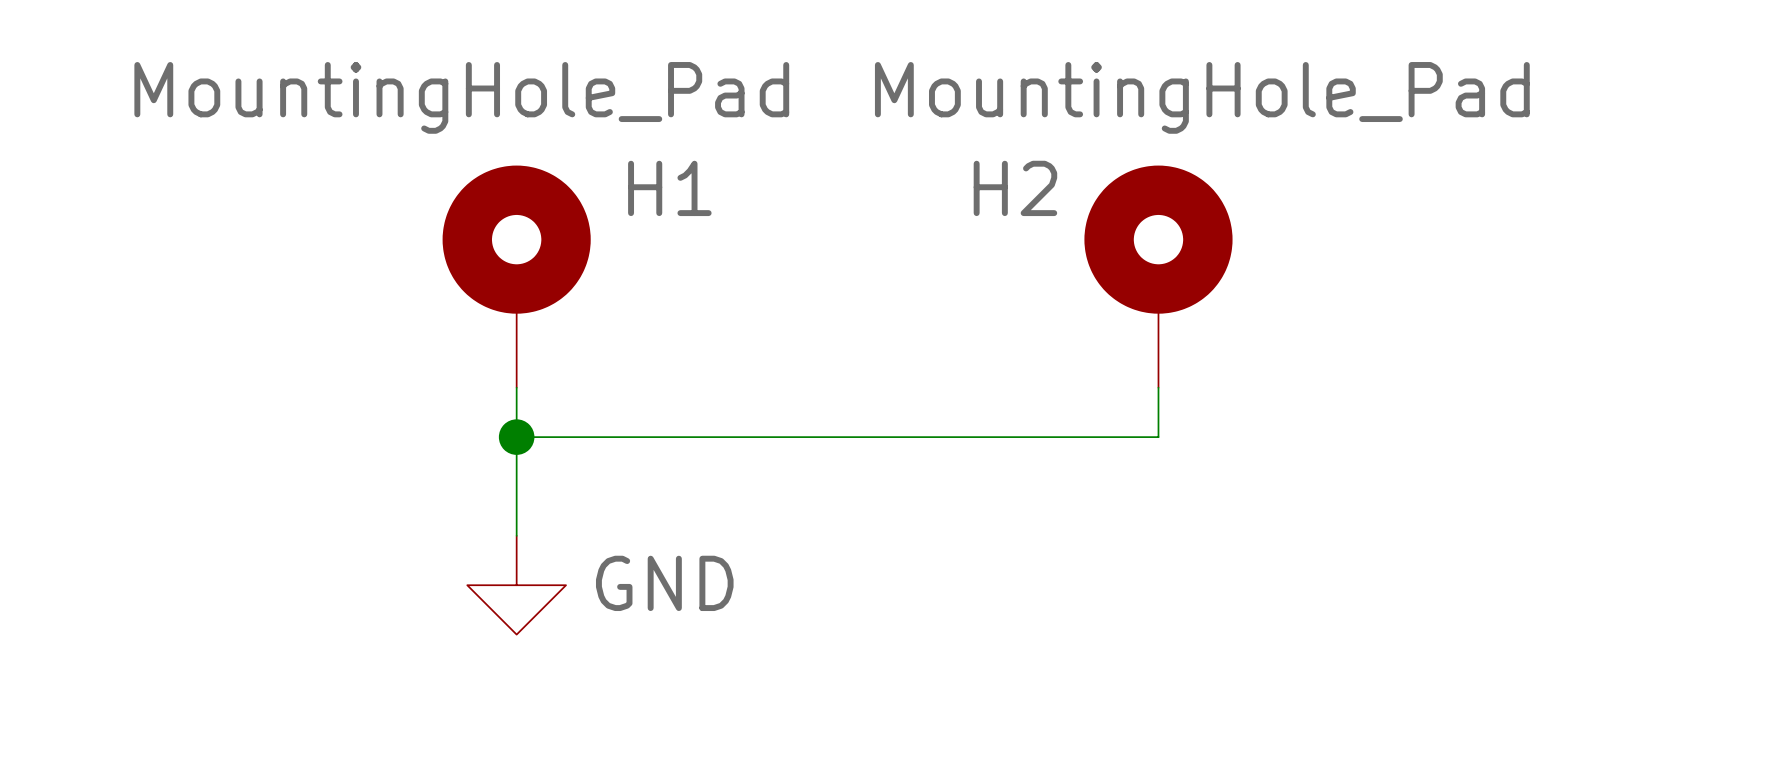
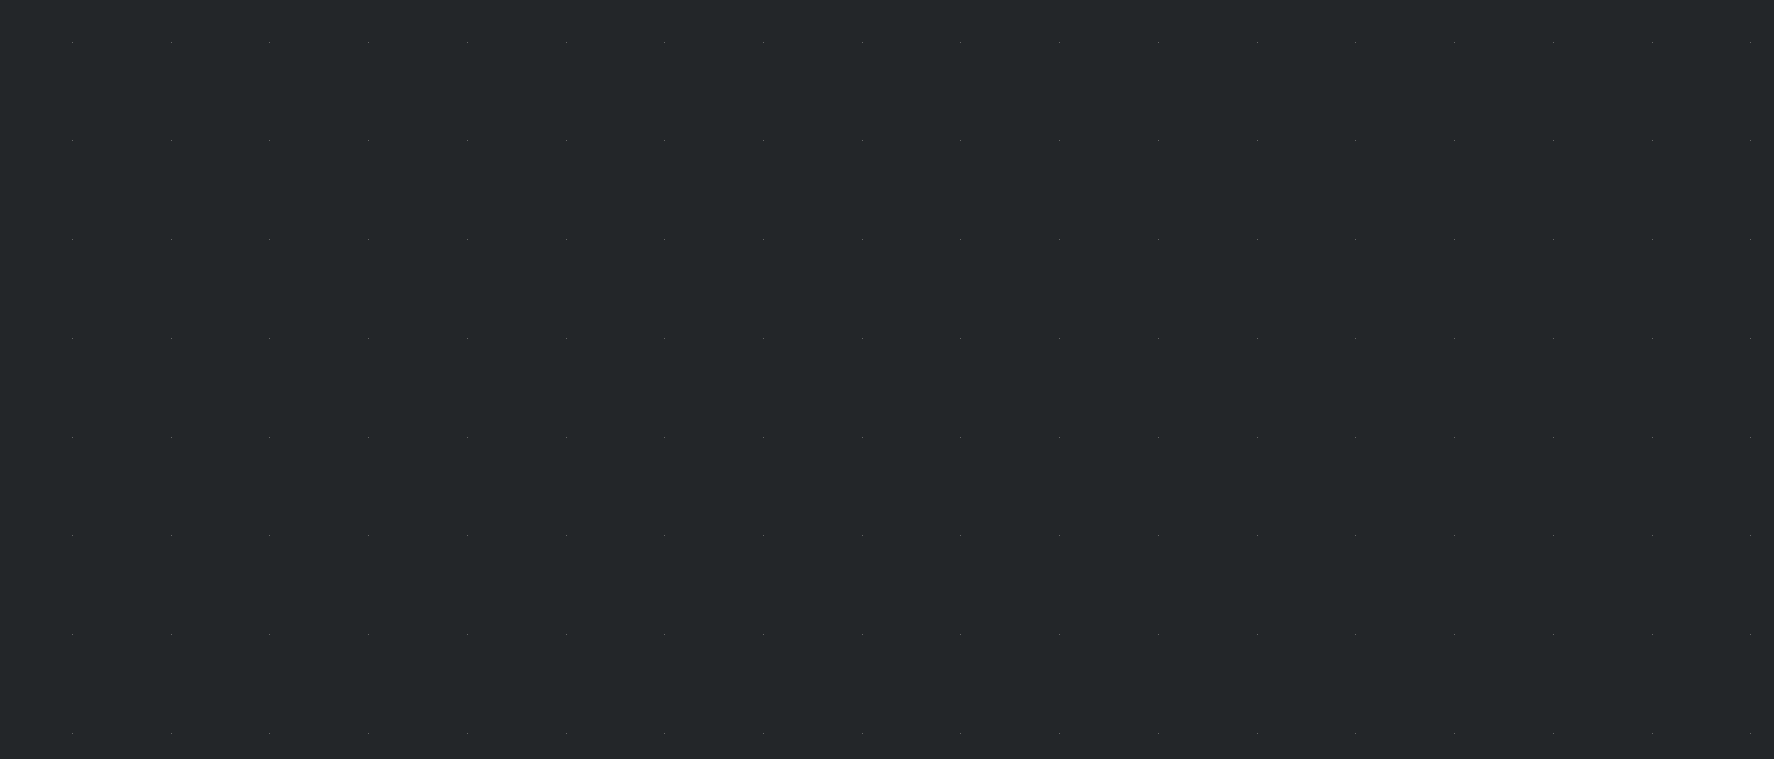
H1: MountingHole_Pad (516, 276) -> none
H2: MountingHole_Pad (1158, 276) -> none
wire: (516, 387) (516, 535) -> none
wire: (1158, 387) (1158, 437) (516, 437) -> none
junction: (516, 437) -> none
power symbol: GND (516, 585) -> none

